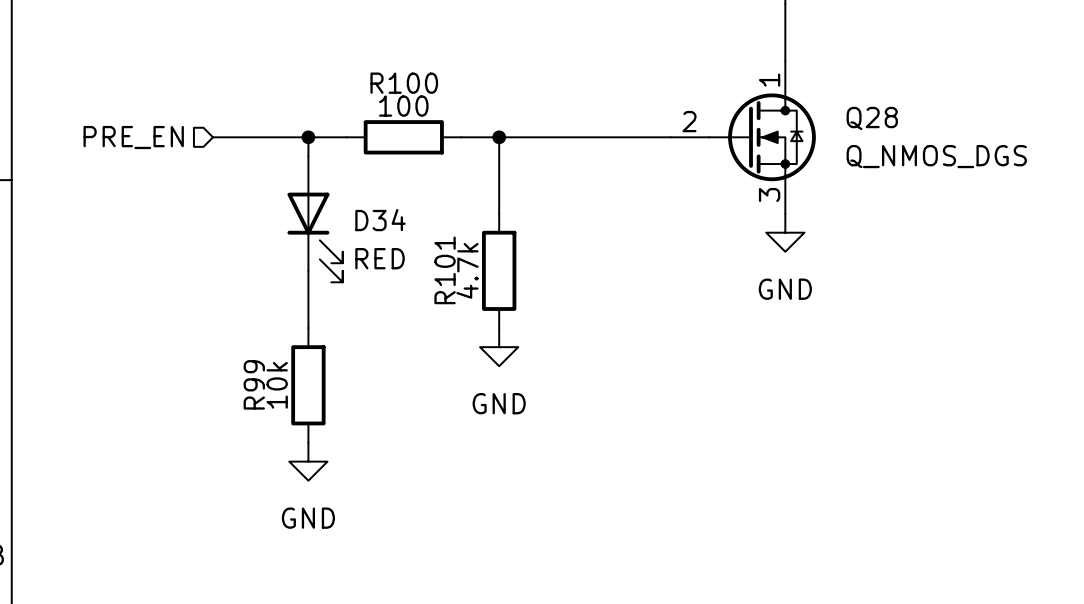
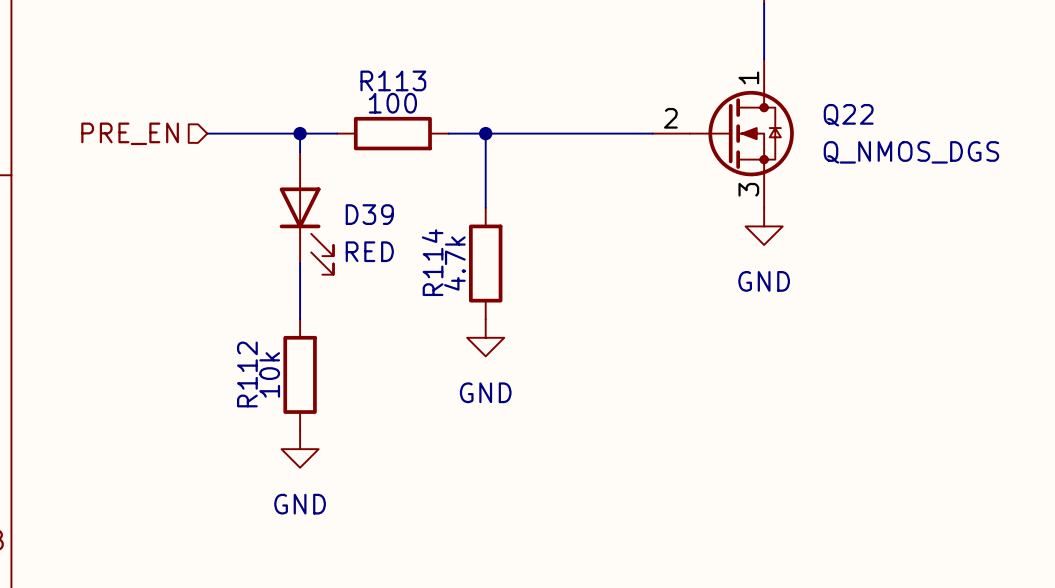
R100 name: R100 (404, 83) -> R113 (393, 80)
Q28 name: Q28 (872, 118) -> Q22 (848, 115)
D34 name: D34 (380, 220) -> D39 (369, 214)
R101 name: R101 (445, 270) -> R114 (432, 262)
R99 name: R99 (254, 384) -> R112 (247, 374)

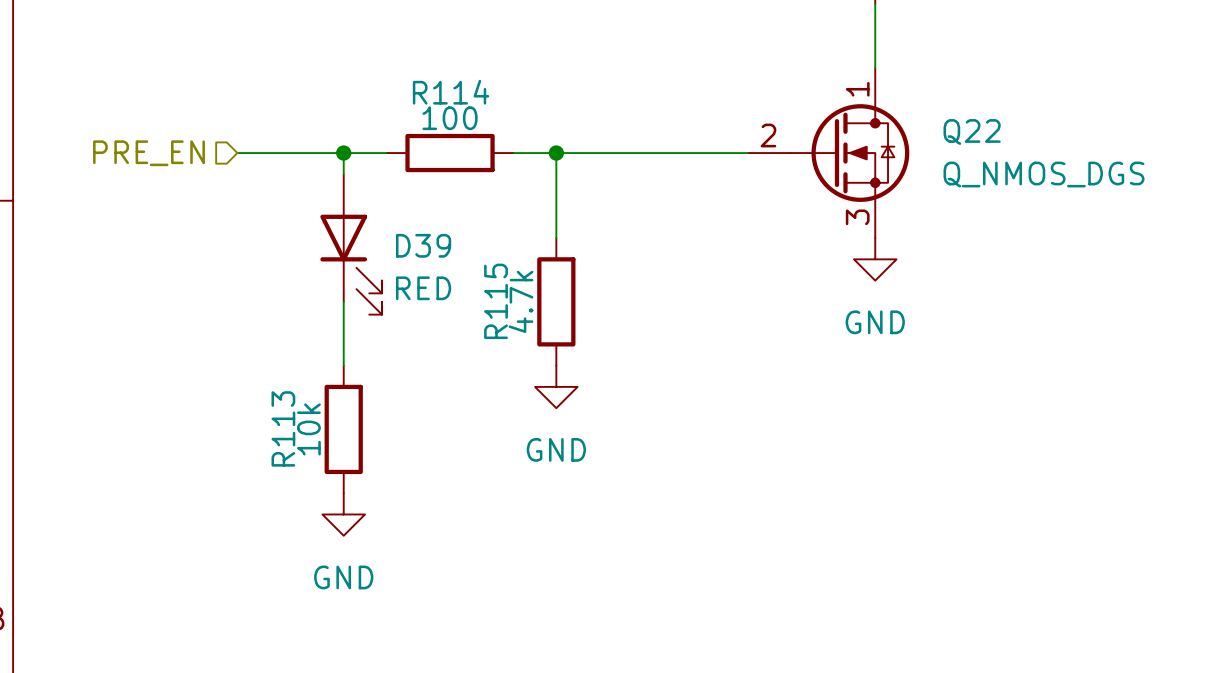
R113 name: R113 (393, 80) -> R114 (451, 92)
R114 name: R114 (432, 262) -> R115 (496, 301)
R112 name: R112 (247, 374) -> R113 (283, 428)

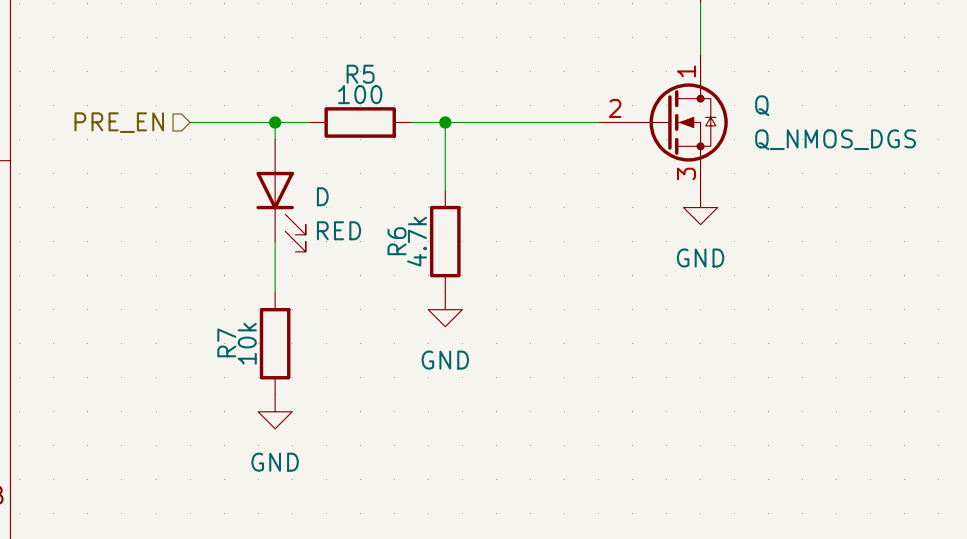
R114 name: R114 (451, 92) -> R5 (360, 74)
Q22 name: Q22 (972, 131) -> Q (762, 105)
D39 name: D39 (423, 245) -> D (322, 196)
R115 name: R115 (496, 301) -> R6 (397, 241)
R113 name: R113 (283, 428) -> R7 (226, 342)

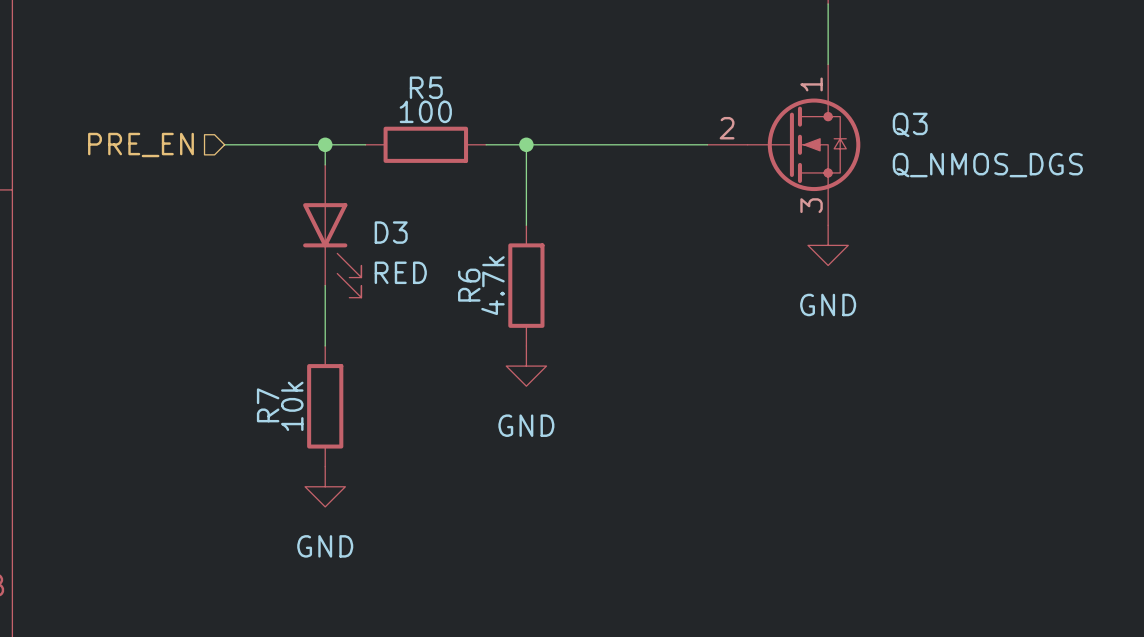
Q name: Q (762, 105) -> Q3 (910, 124)
D name: D (322, 196) -> D3 (391, 232)

